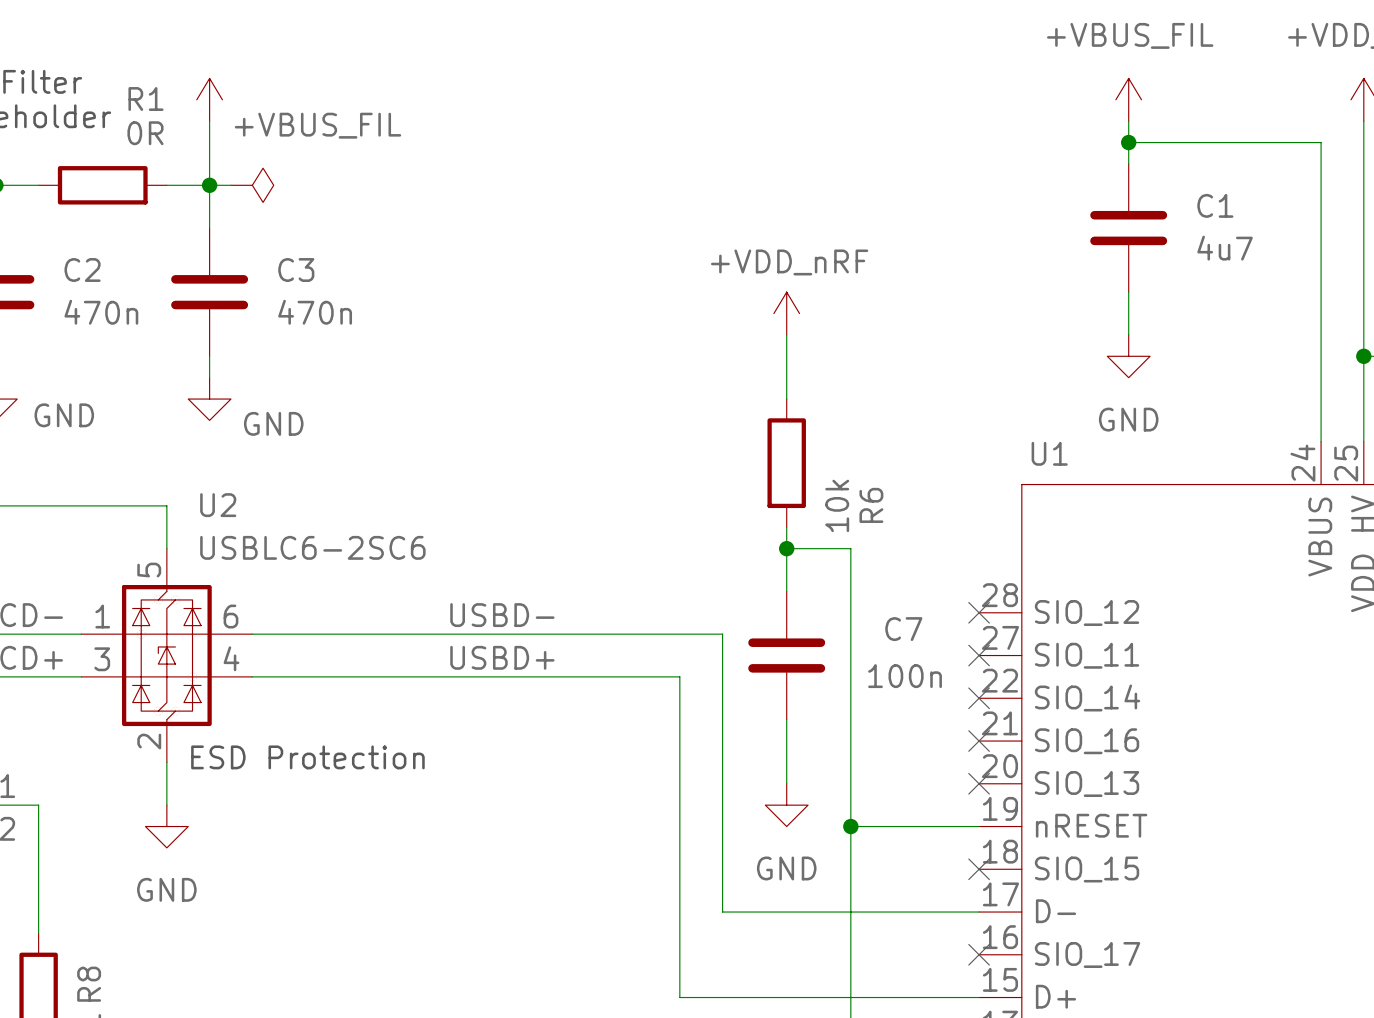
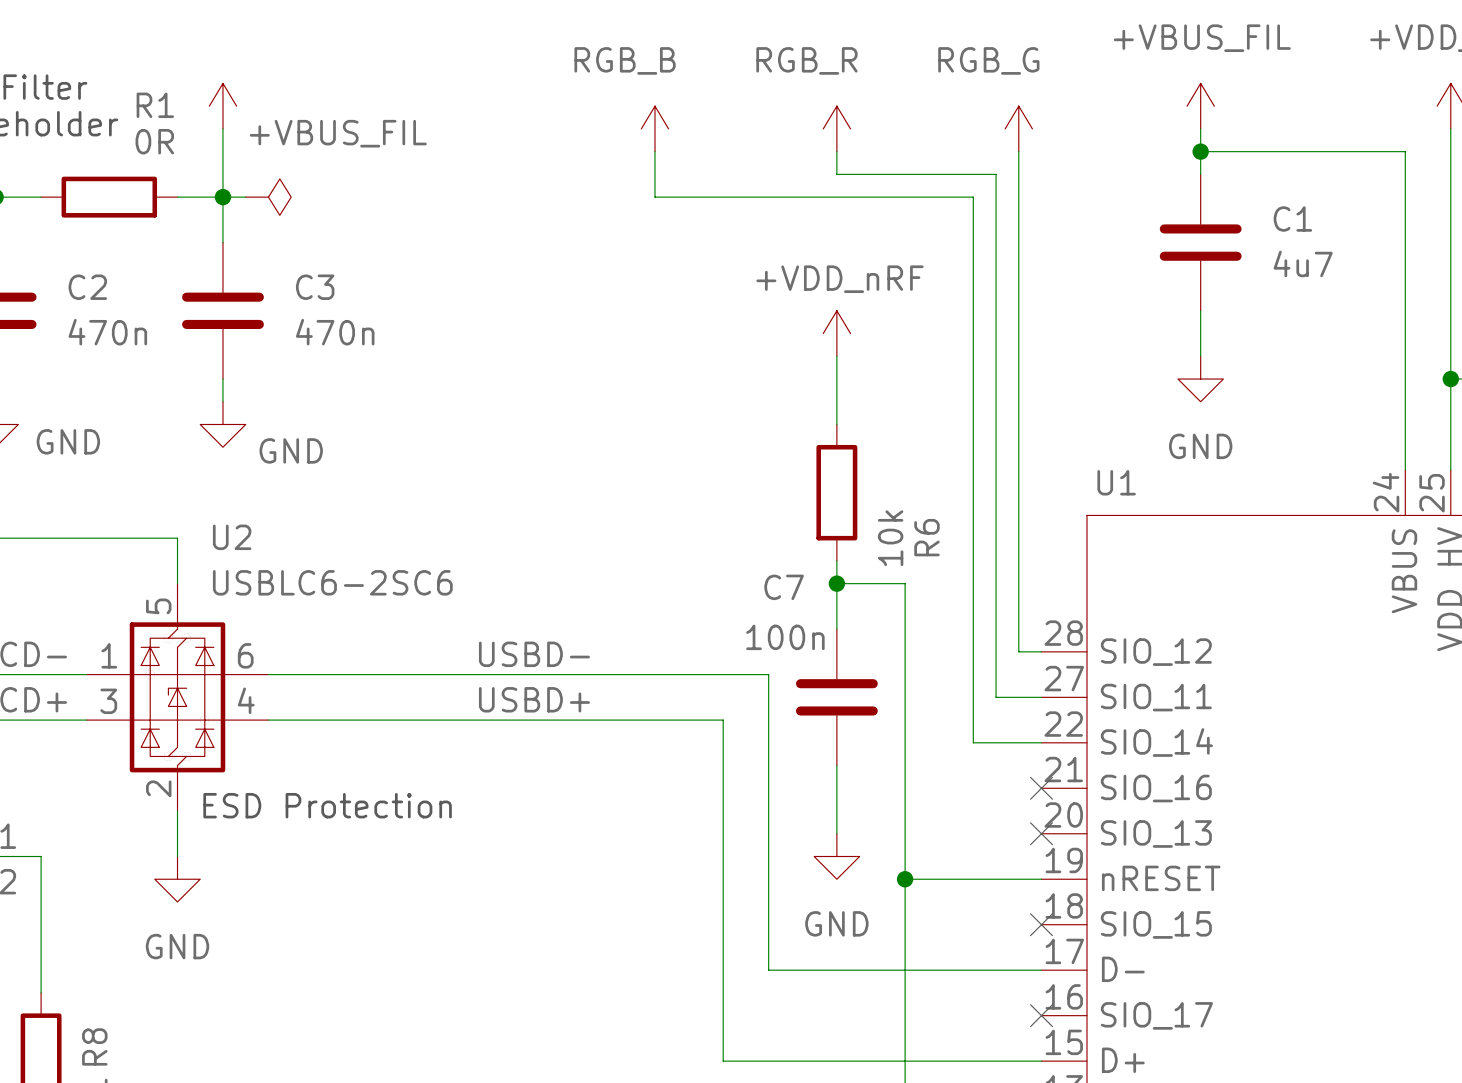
power symbol: none -> RGB_B (654, 128)
power symbol: none -> RGB_R (836, 128)
power symbol: none -> RGB_G (1018, 128)
wire: none -> (654, 151) (654, 197) (973, 197) (973, 742) (1041, 742)
wire: none -> (836, 151) (836, 174) (996, 174) (996, 697) (1041, 697)
wire: none -> (1018, 151) (1018, 651) (1041, 651)
no-connect mark: (979, 612) -> none
C7 name position: C7 (903, 629) -> C7 (784, 587)
no-connect mark: (979, 655) -> none
C7 value position: 100n (905, 676) -> 100n (785, 637)
no-connect mark: (979, 698) -> none

